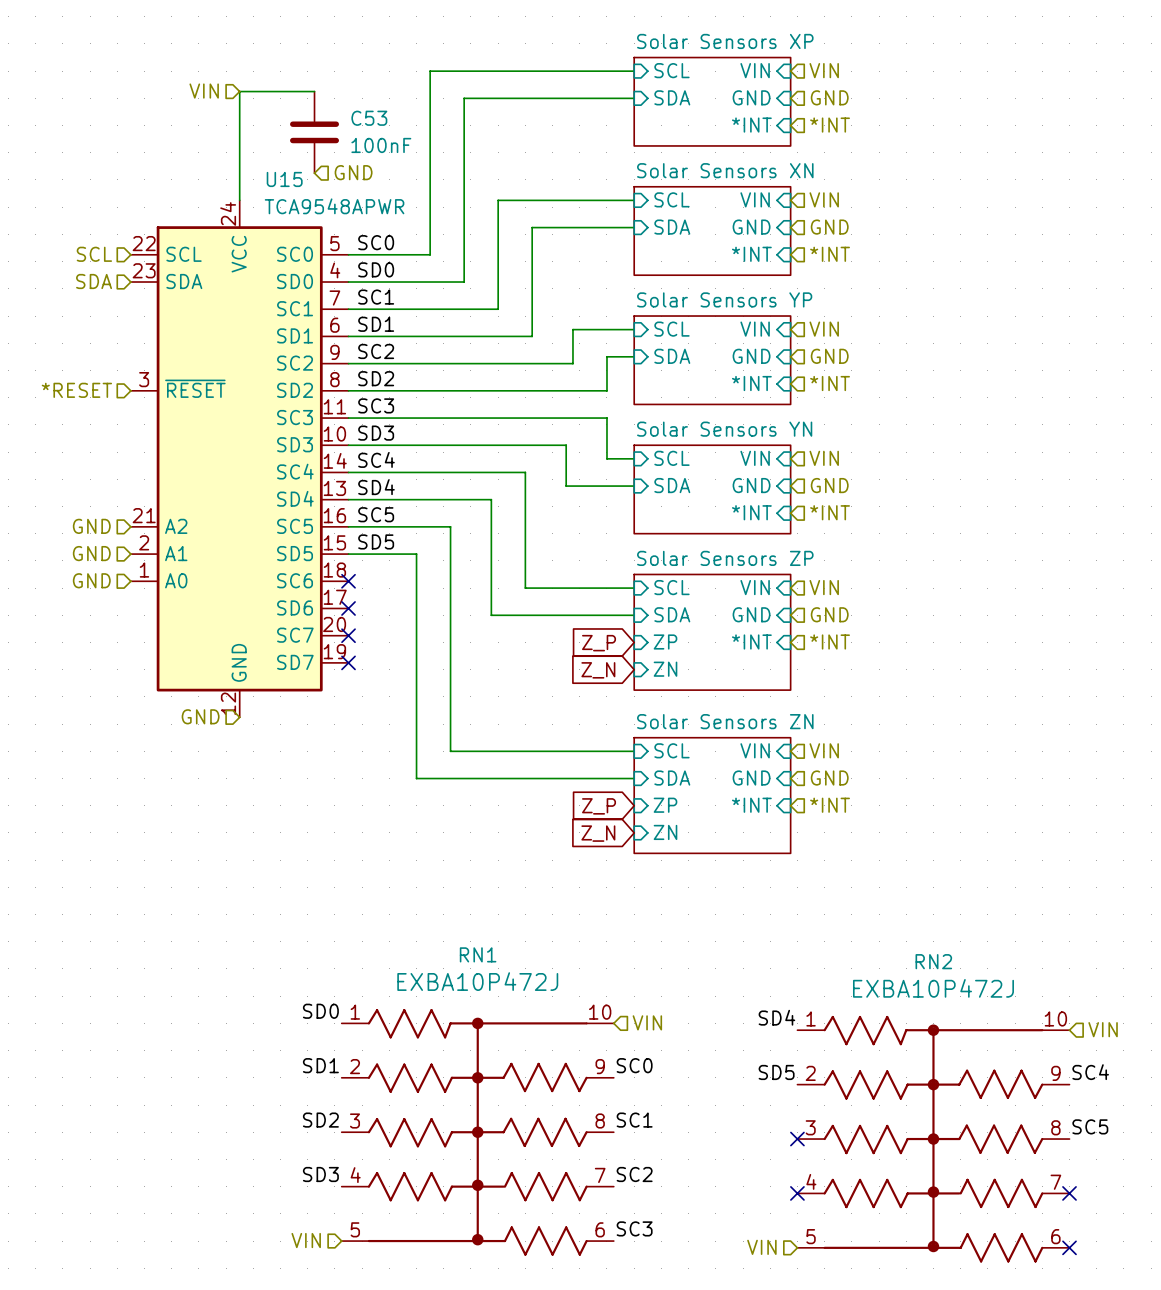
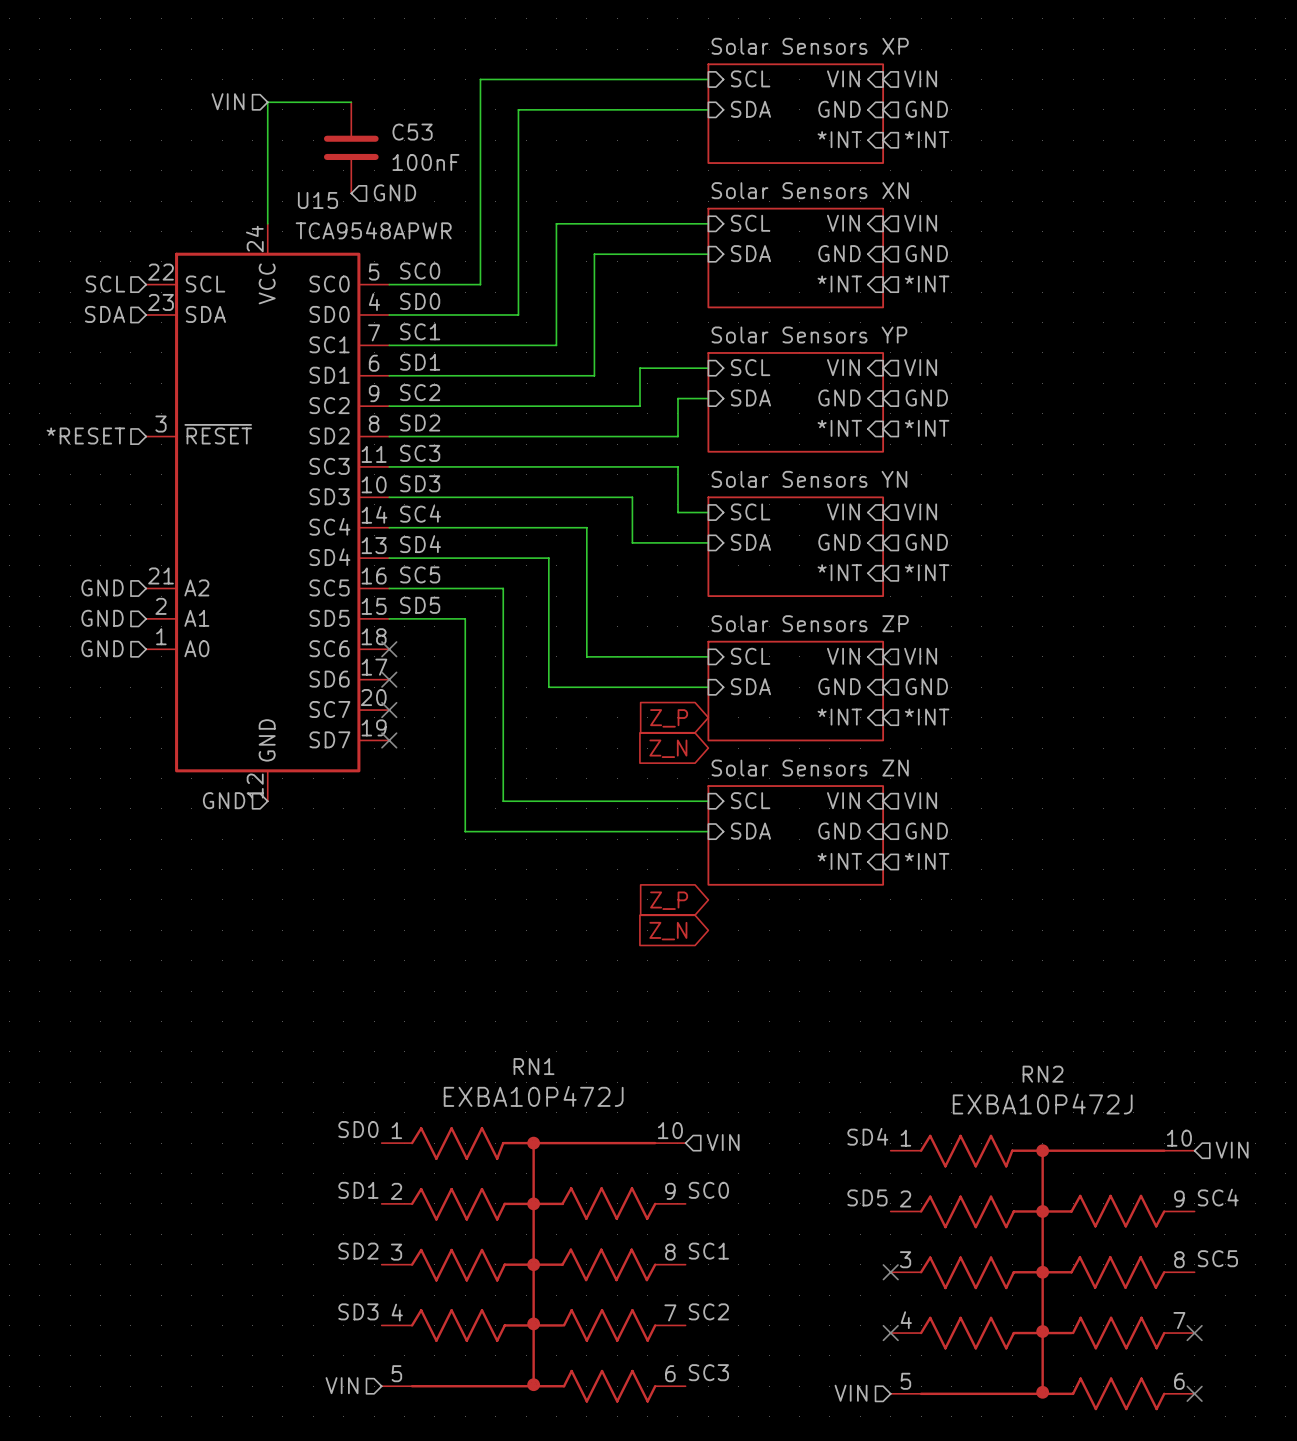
sheet Solar Sensors ZP: none -> (795, 691)
sheet Solar Sensors ZP: (712, 632) -> none
sheet pin: ZP (665, 641) -> none
sheet pin: ZN (665, 669) -> none
wire: (450, 717) (450, 751) (634, 751) -> (503, 801) (708, 801)
wire: (416, 744) (416, 778) (634, 778) -> (465, 831) (708, 831)
sheet Solar Sensors ZN: none -> (795, 835)
sheet pin position: SCL (671, 750) -> SCL (750, 800)
sheet pin position: VIN (755, 750) -> VIN (843, 800)
hierarchical label position: VIN (824, 750) -> VIN (920, 800)
sheet pin position: SDA (672, 778) -> SDA (750, 831)
sheet pin position: GND (751, 778) -> GND (839, 831)
hierarchical label position: GND (829, 778) -> GND (926, 831)
sheet Solar Sensors ZN: (712, 795) -> none
sheet pin: ZP (665, 805) -> none
sheet pin position: *INT (751, 805) -> *INT (839, 861)
hierarchical label position: *INT (830, 805) -> *INT (927, 861)
sheet pin: ZN (665, 832) -> none

